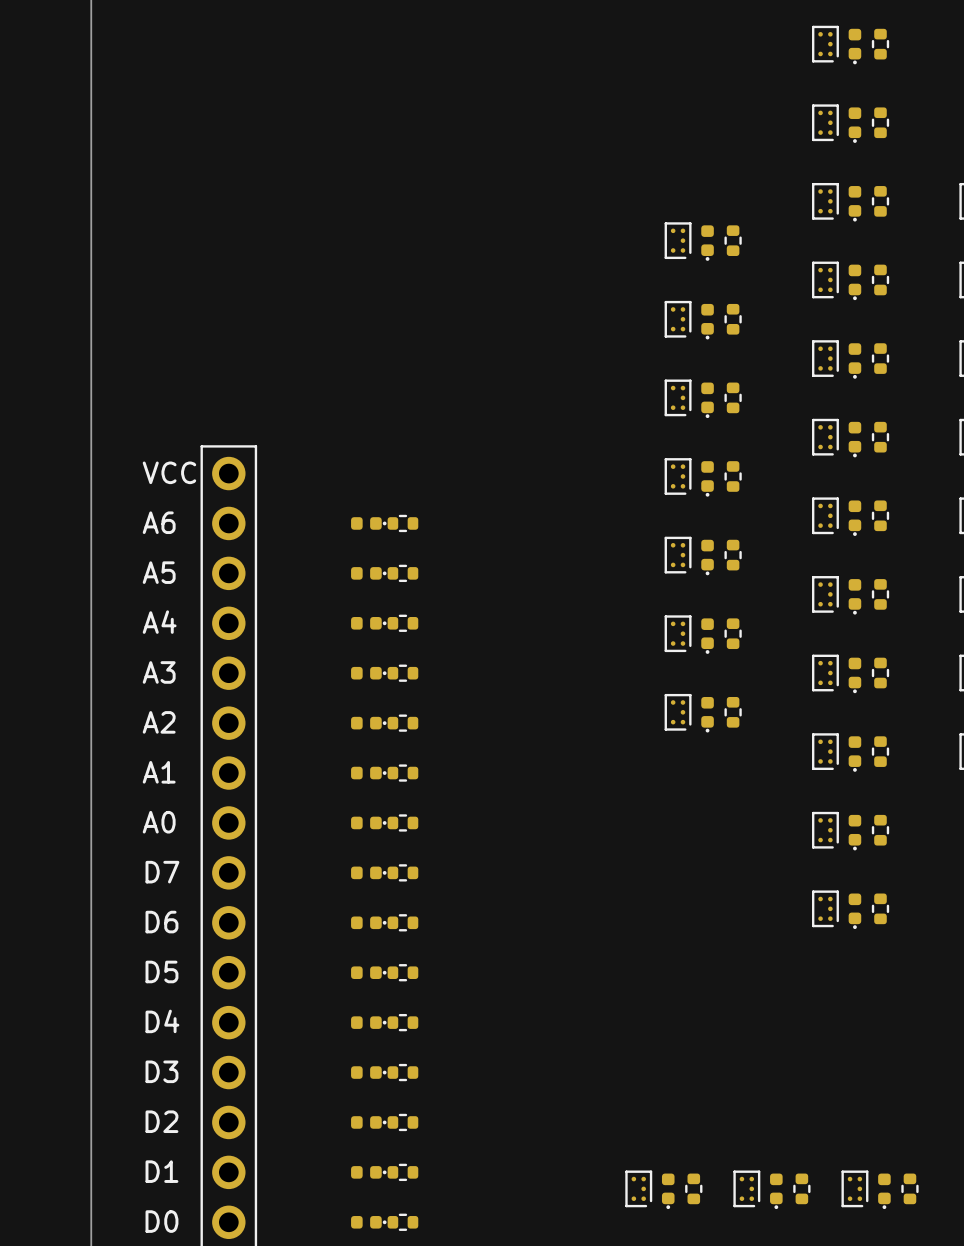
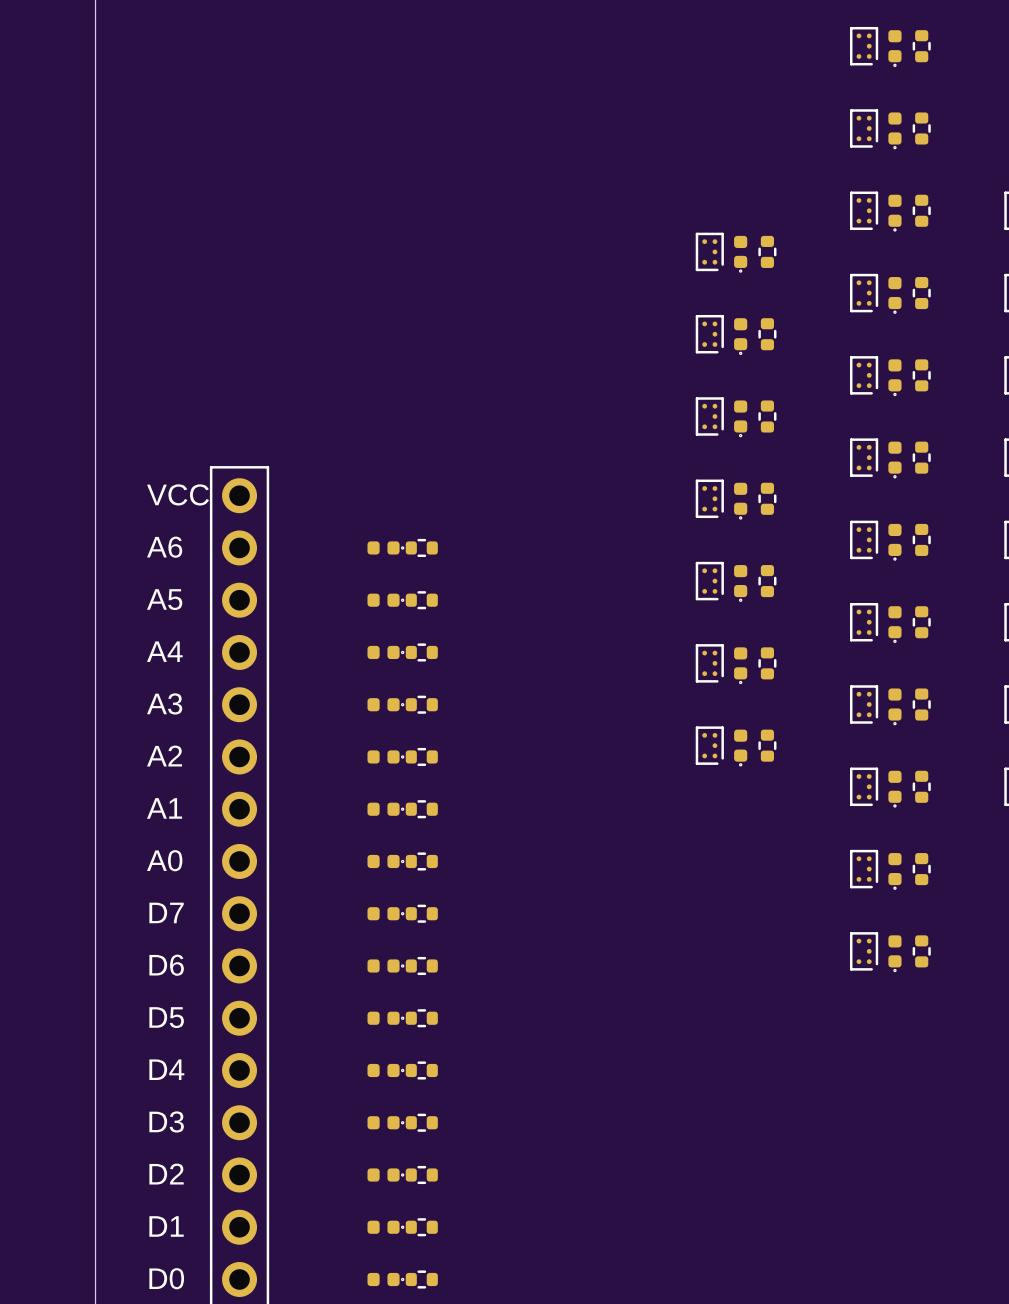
part: (638, 1188) -> none
part: (693, 1188) -> none
part: (746, 1188) -> none
part: (801, 1188) -> none
part: (854, 1188) -> none
part: (909, 1188) -> none
part: (668, 1191) -> none
part: (776, 1191) -> none
part: (884, 1191) -> none

